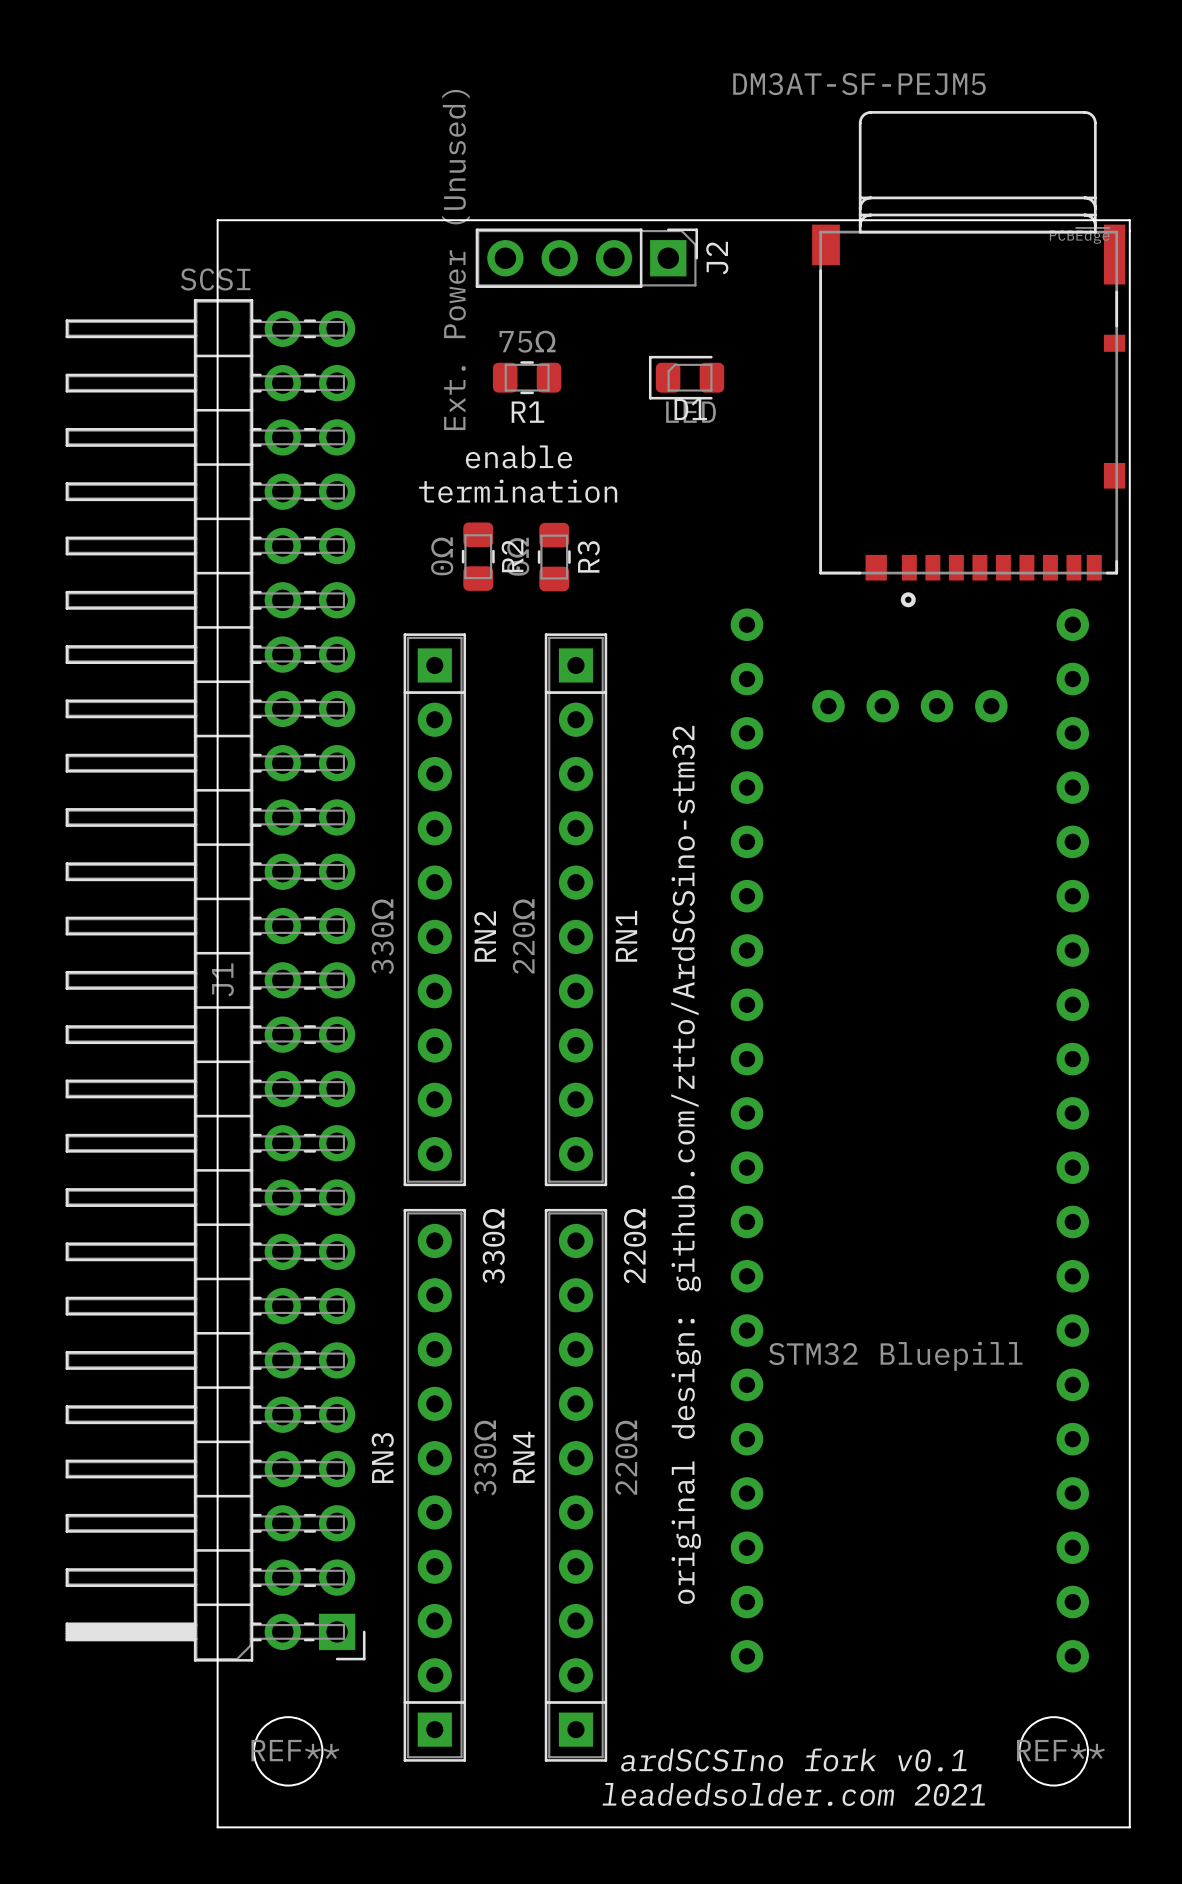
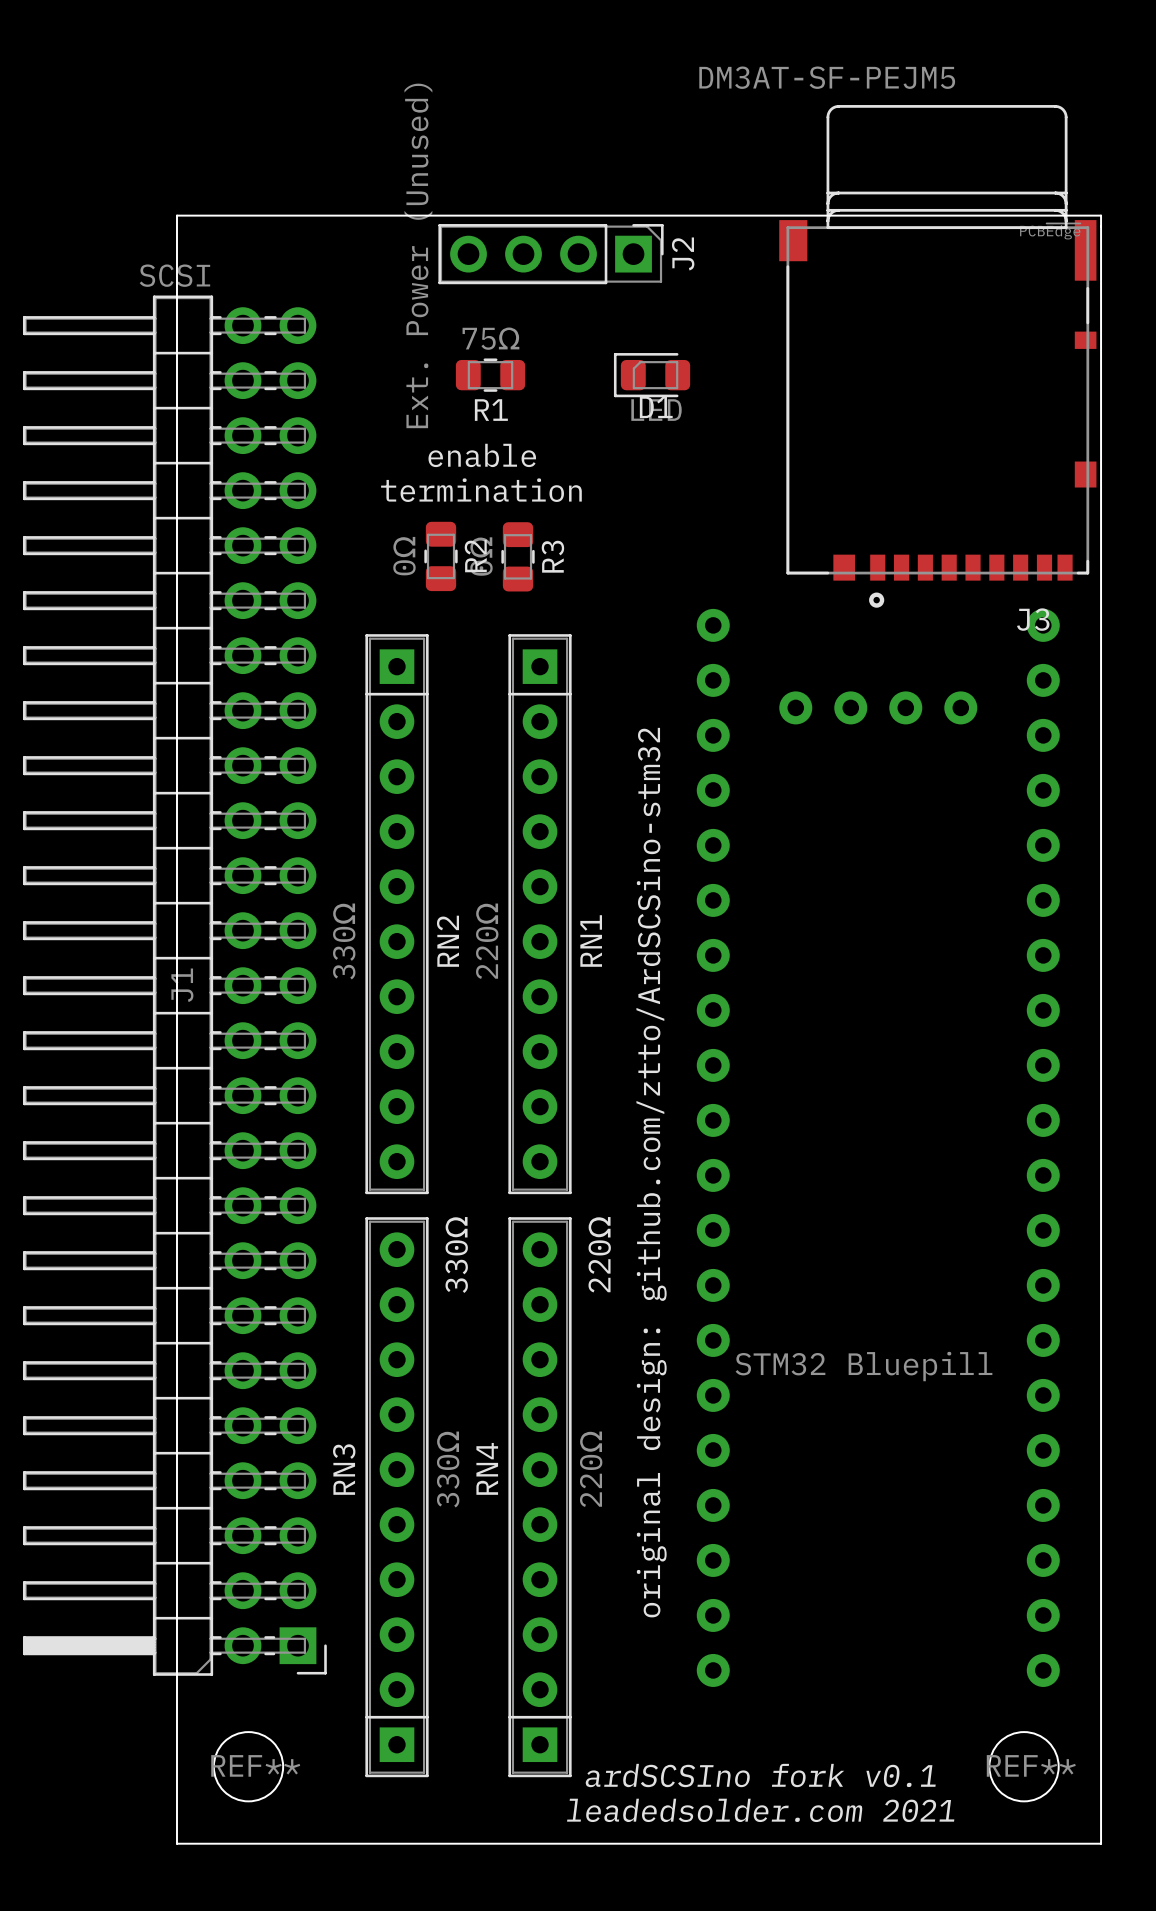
J3 name: none -> J3 (1033, 619)

